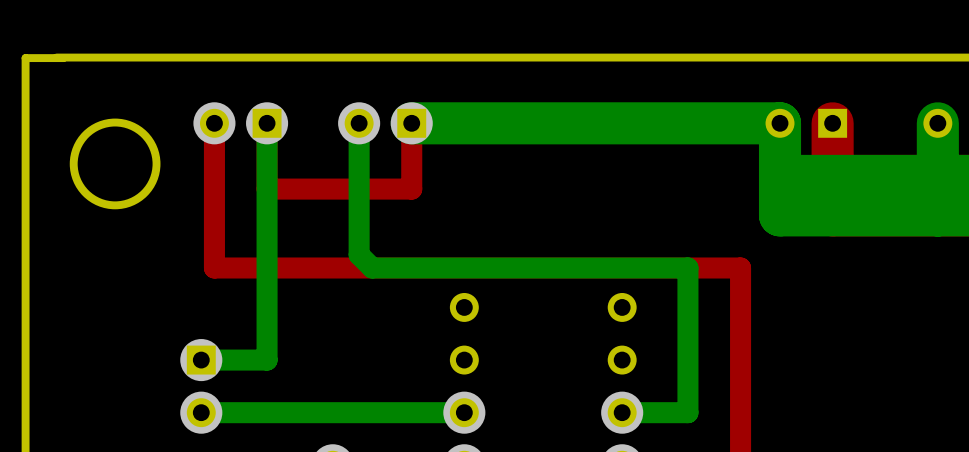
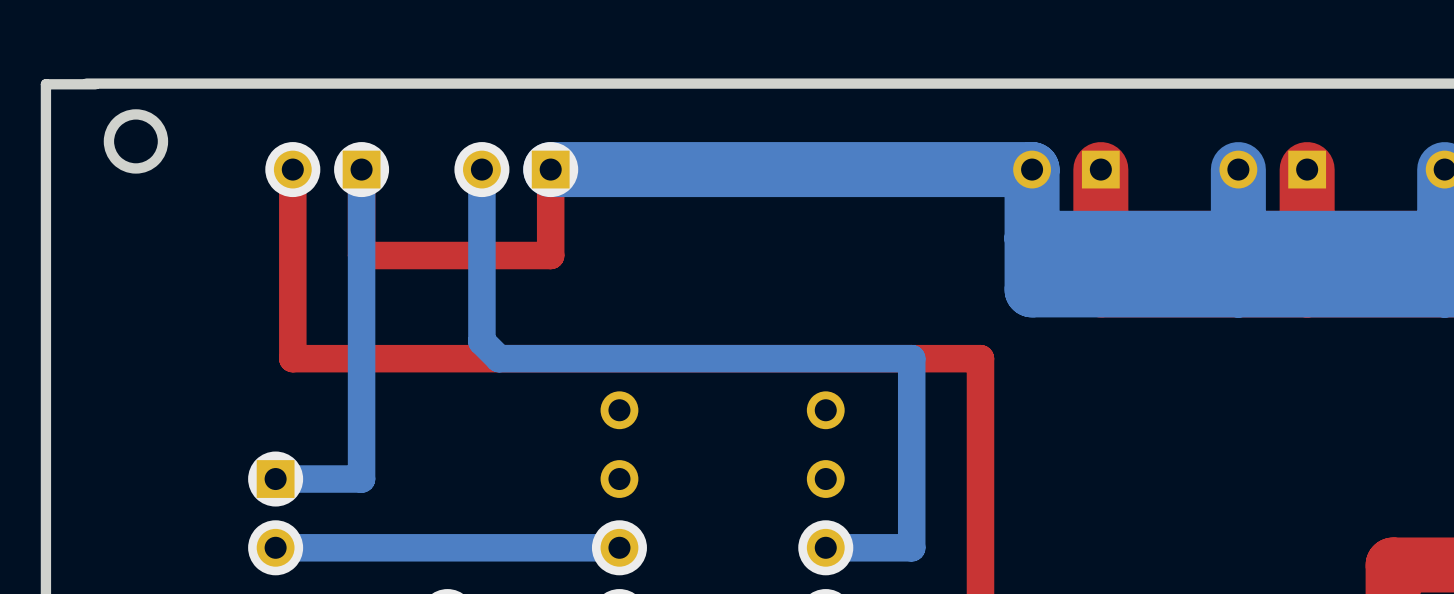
round board edge: none -> [103, 109, 169, 174]
round board edge: [69, 118, 161, 210] -> none

